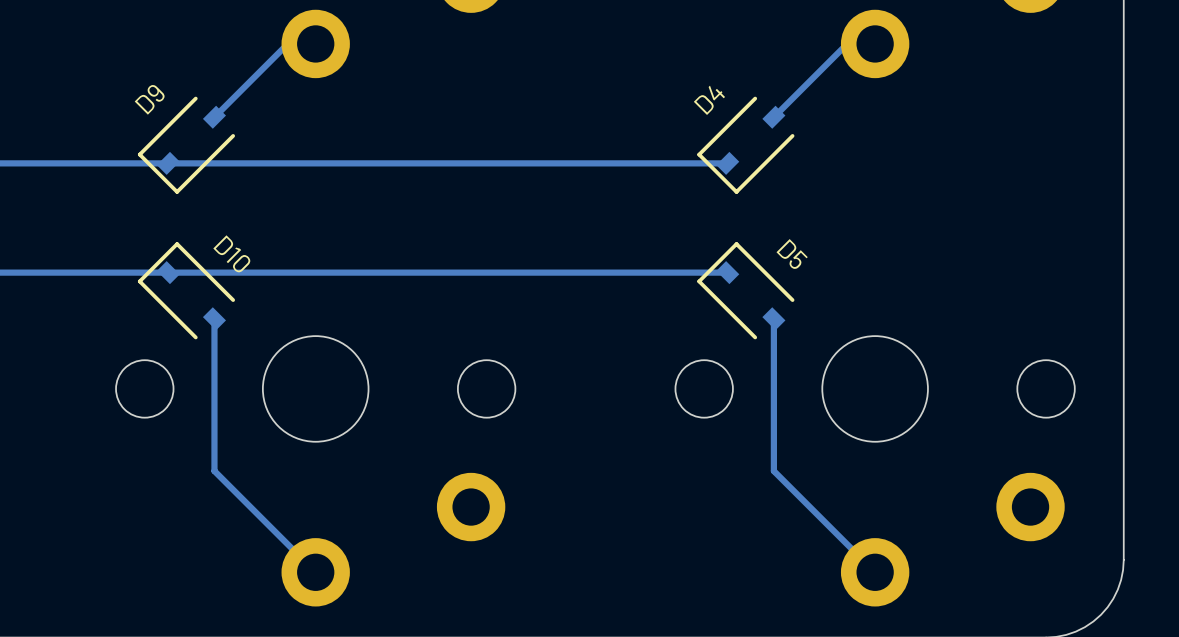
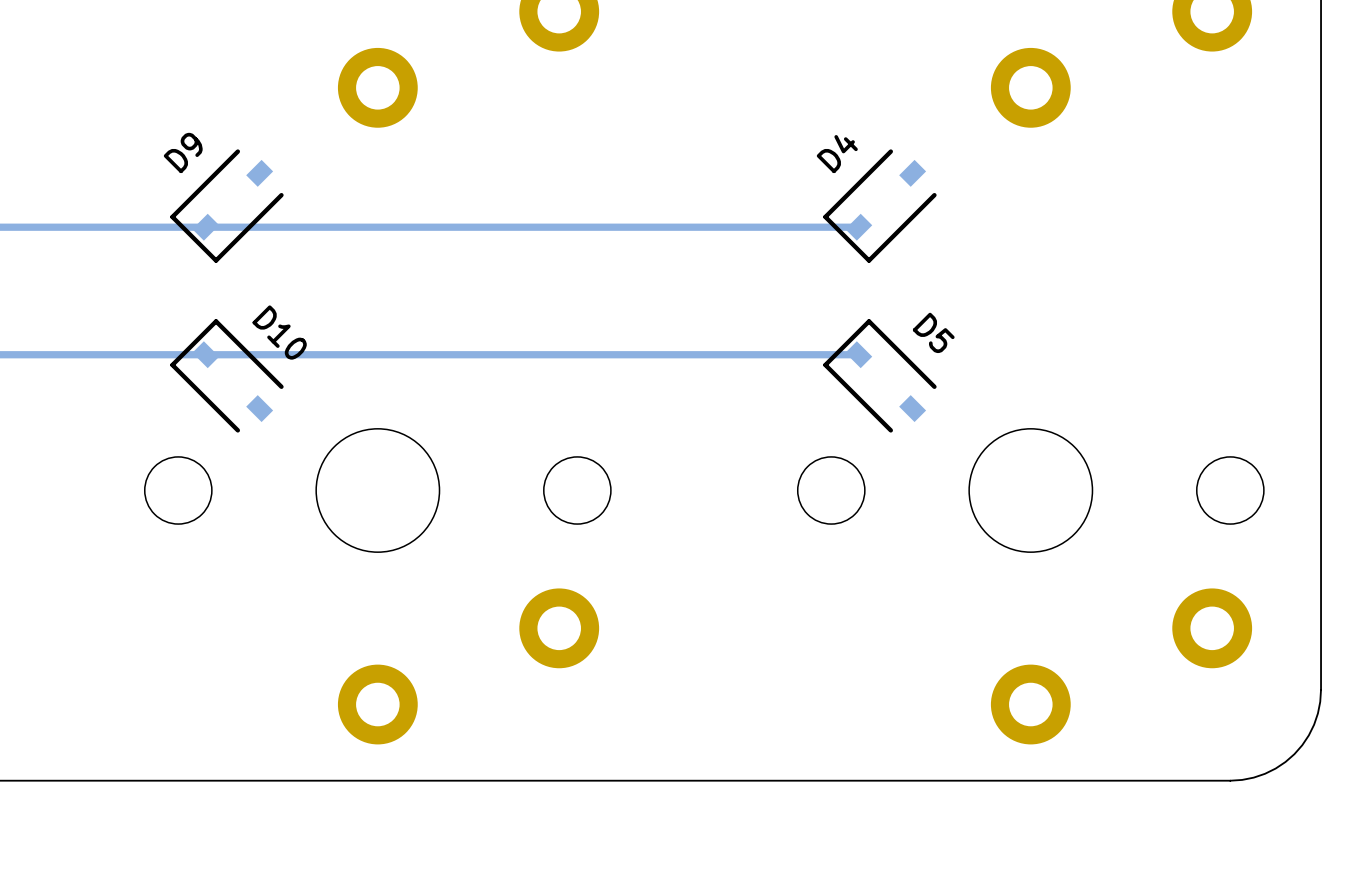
track: (315, 43) (287, 43) (214, 117) -> none
track: (875, 43) (847, 43) (773, 117) -> none
track: (214, 318) (214, 471) (315, 572) -> none
track: (773, 318) (773, 471) (875, 572) -> none

